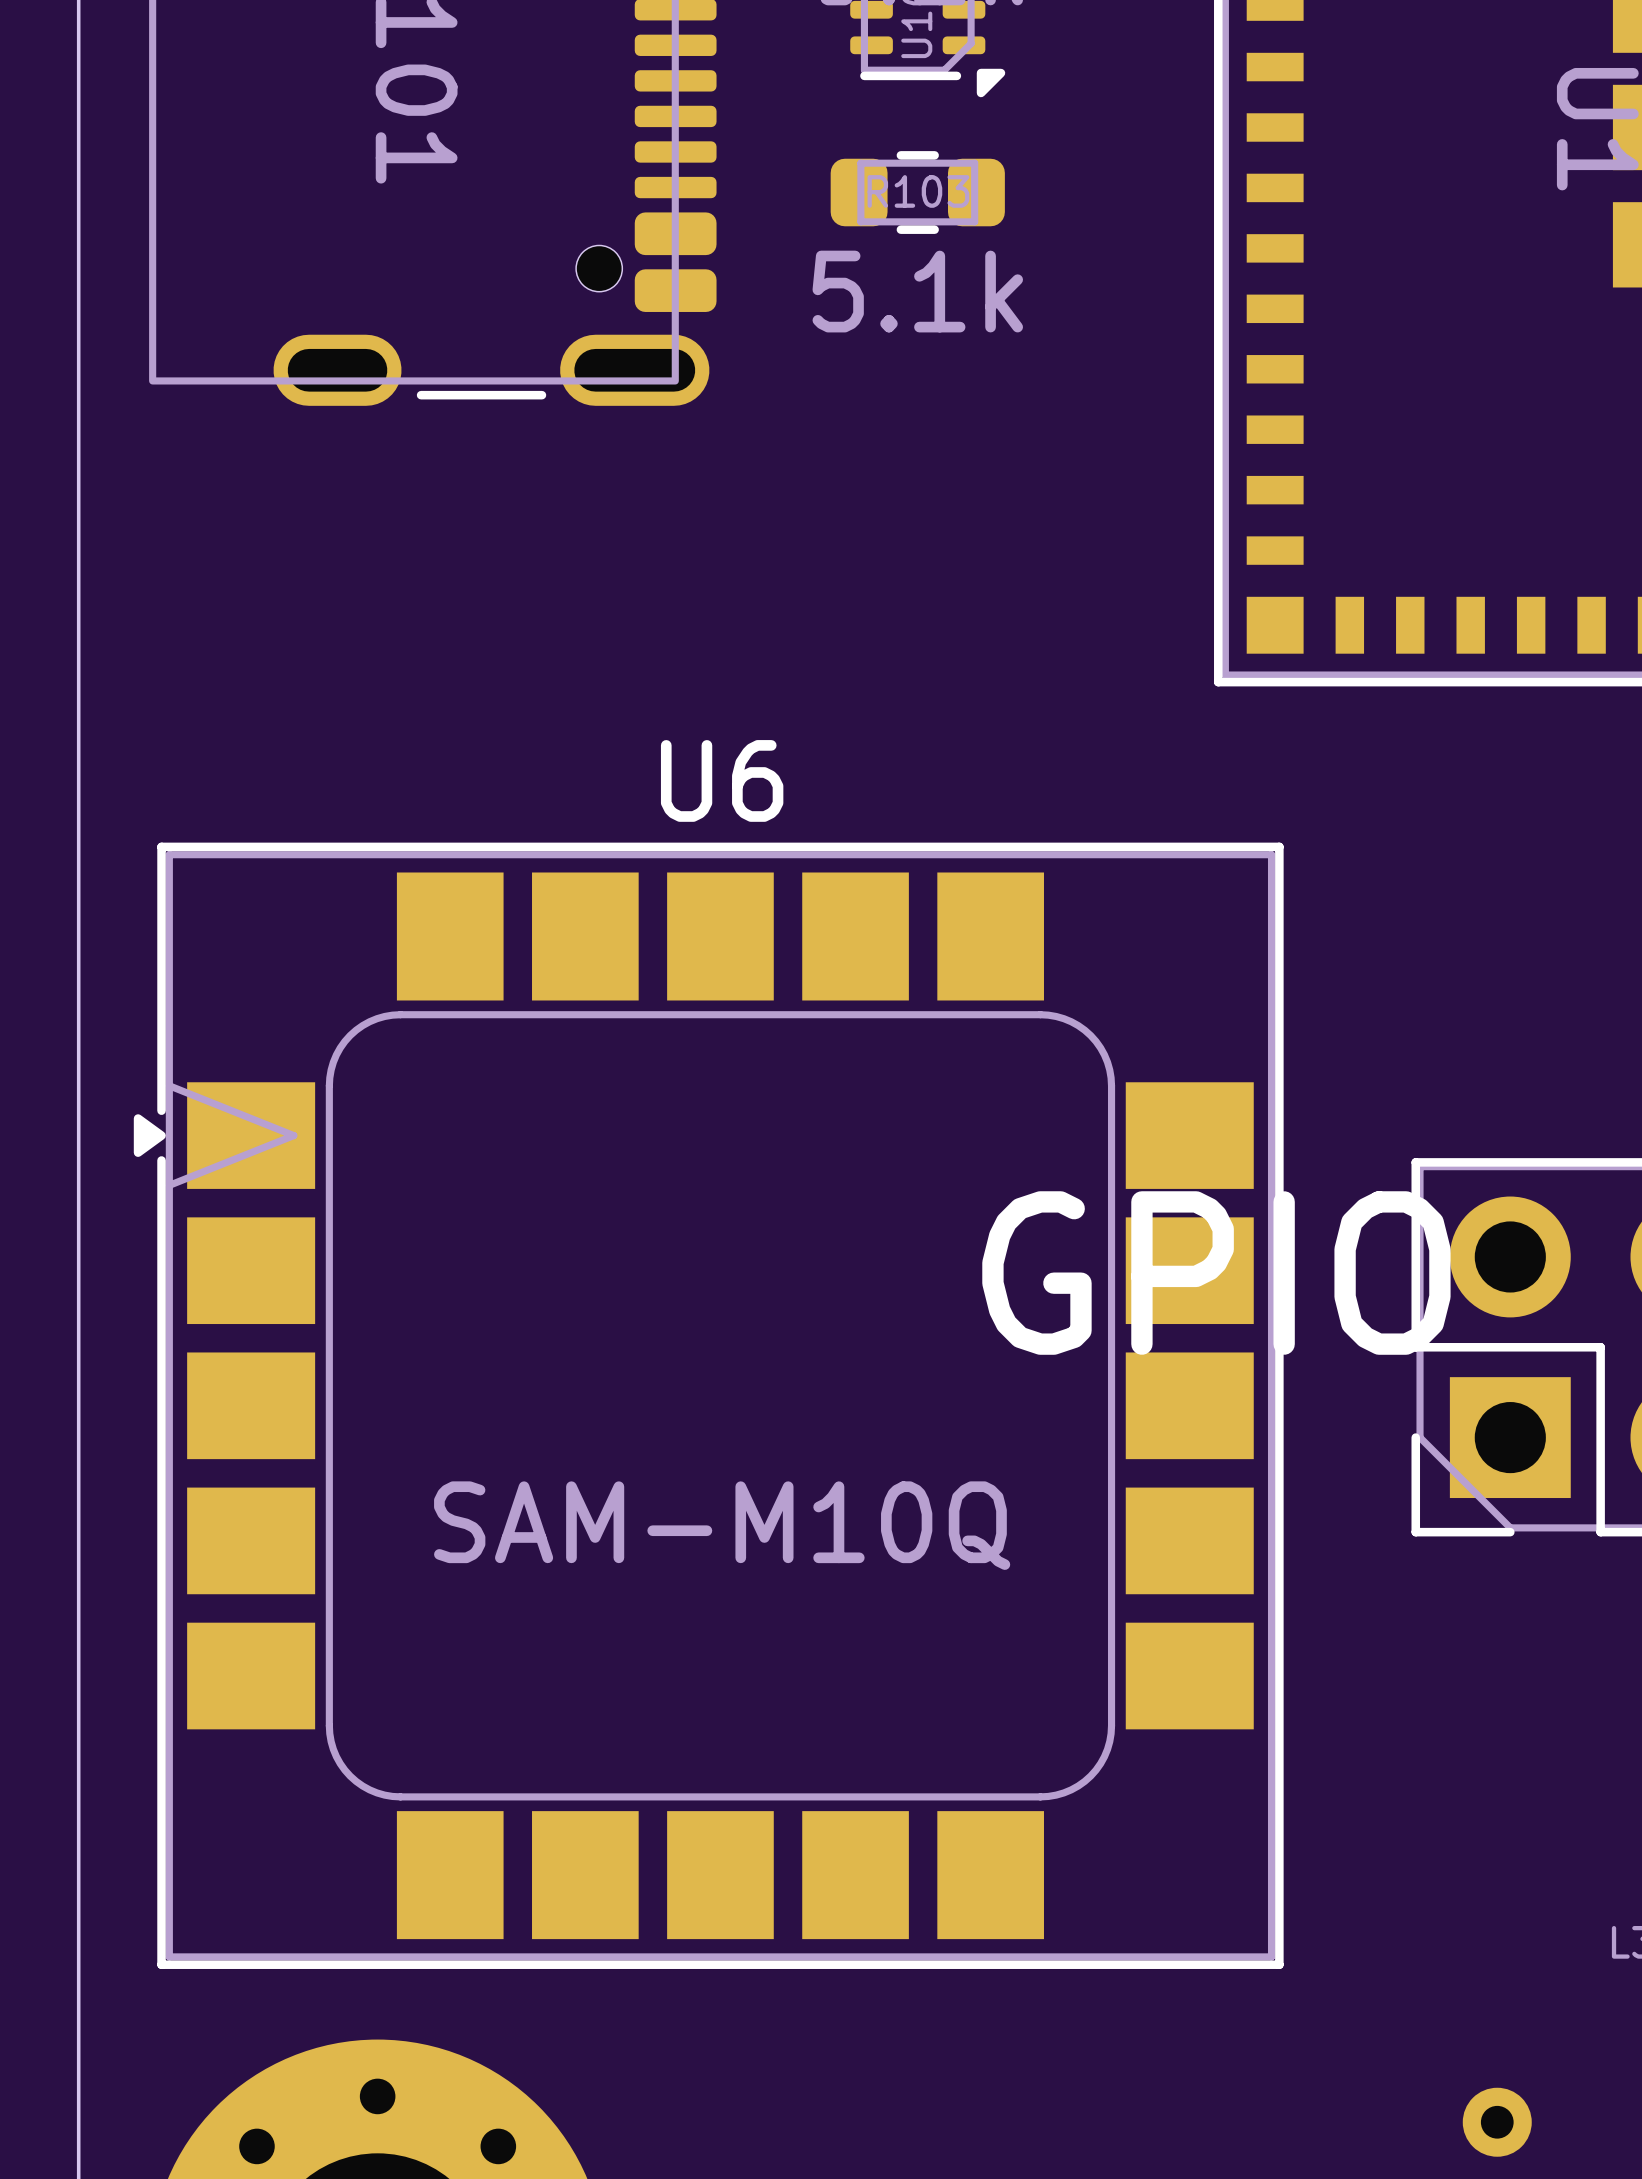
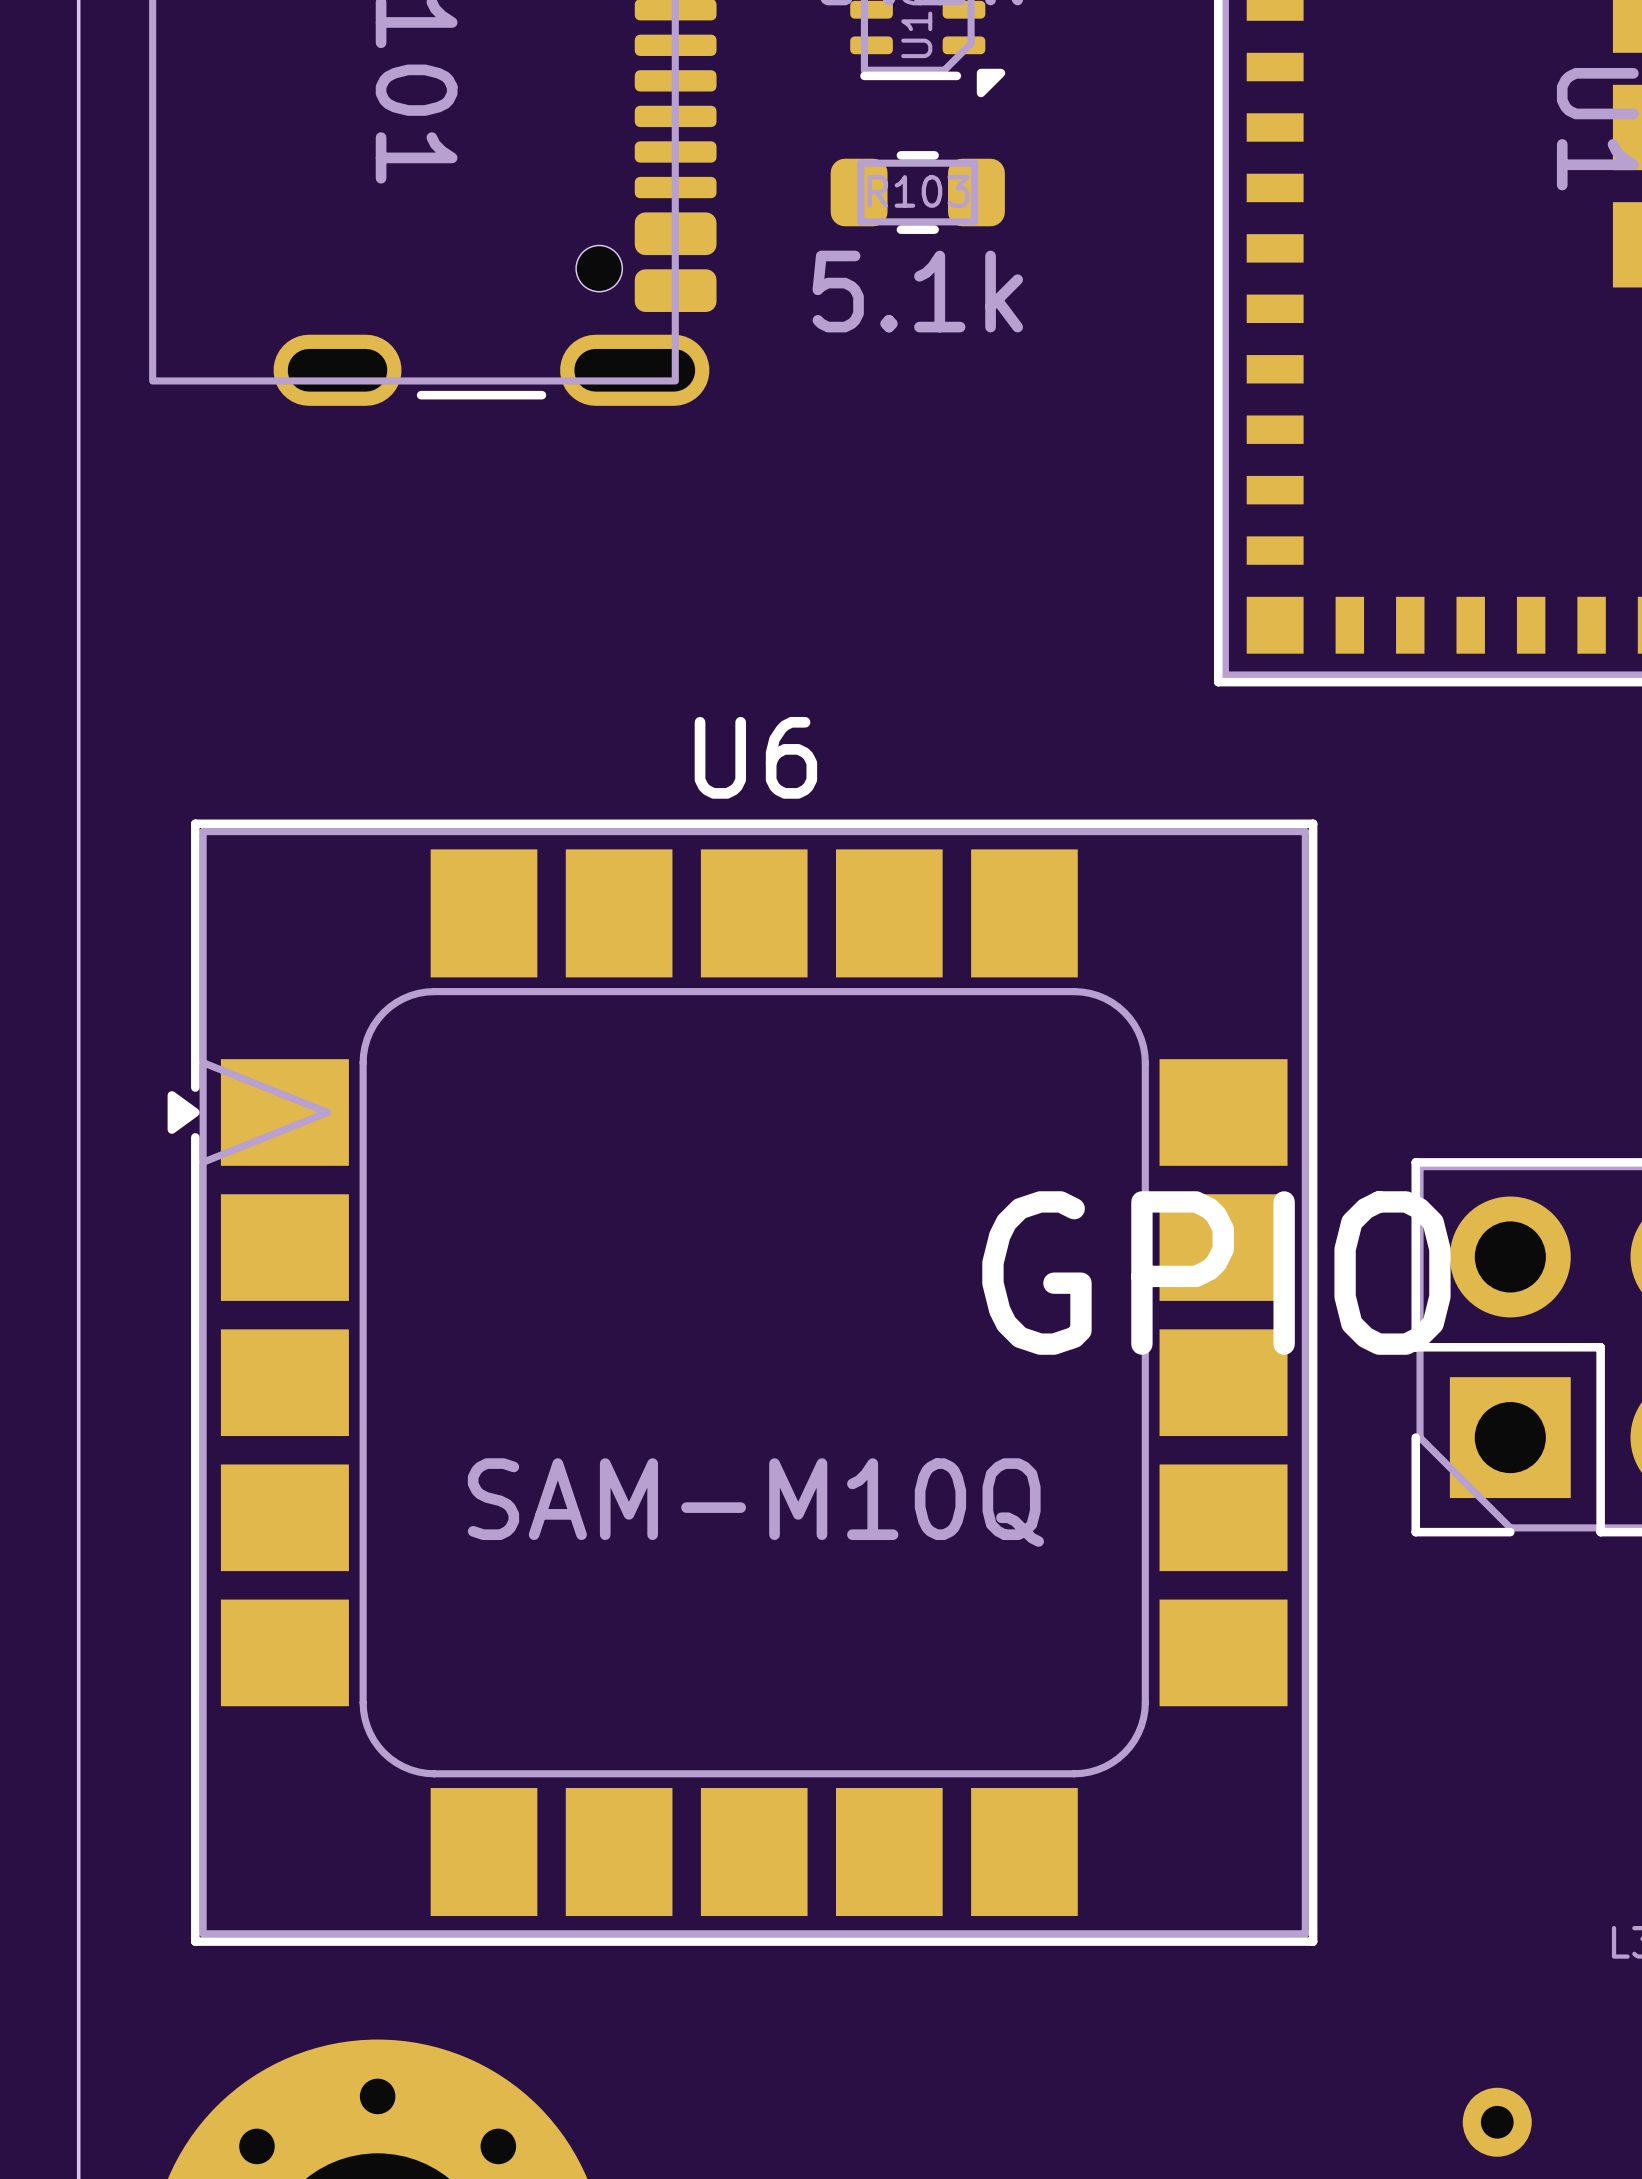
U6 position: (708, 1405) -> (742, 1382)

